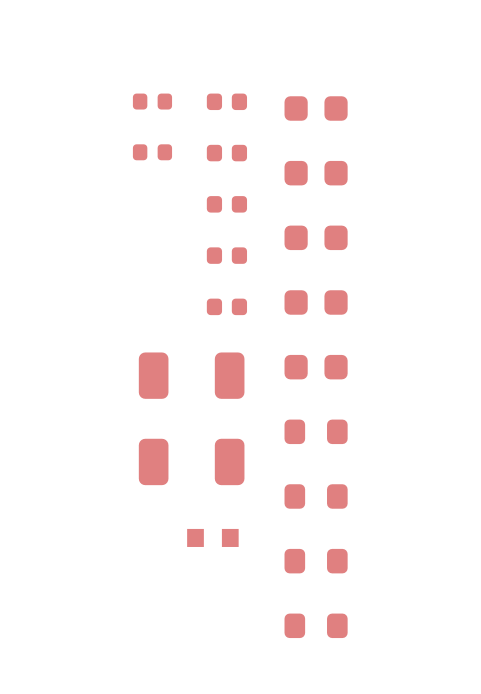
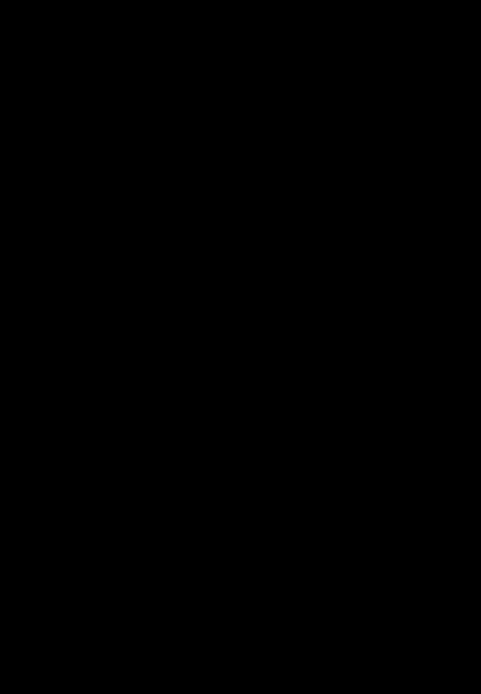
part: (152, 101) -> none
part: (226, 101) -> none
part: (316, 108) -> none
part: (152, 152) -> none
part: (226, 153) -> none
part: (316, 173) -> none
part: (226, 204) -> none
part: (316, 237) -> none
part: (226, 255) -> none
part: (316, 302) -> none
part: (226, 306) -> none
part: (316, 367) -> none
part: (191, 375) -> none
part: (316, 431) -> none
part: (191, 461) -> none
part: (316, 496) -> none
part: (212, 537) -> none
part: (316, 561) -> none
part: (316, 625) -> none

